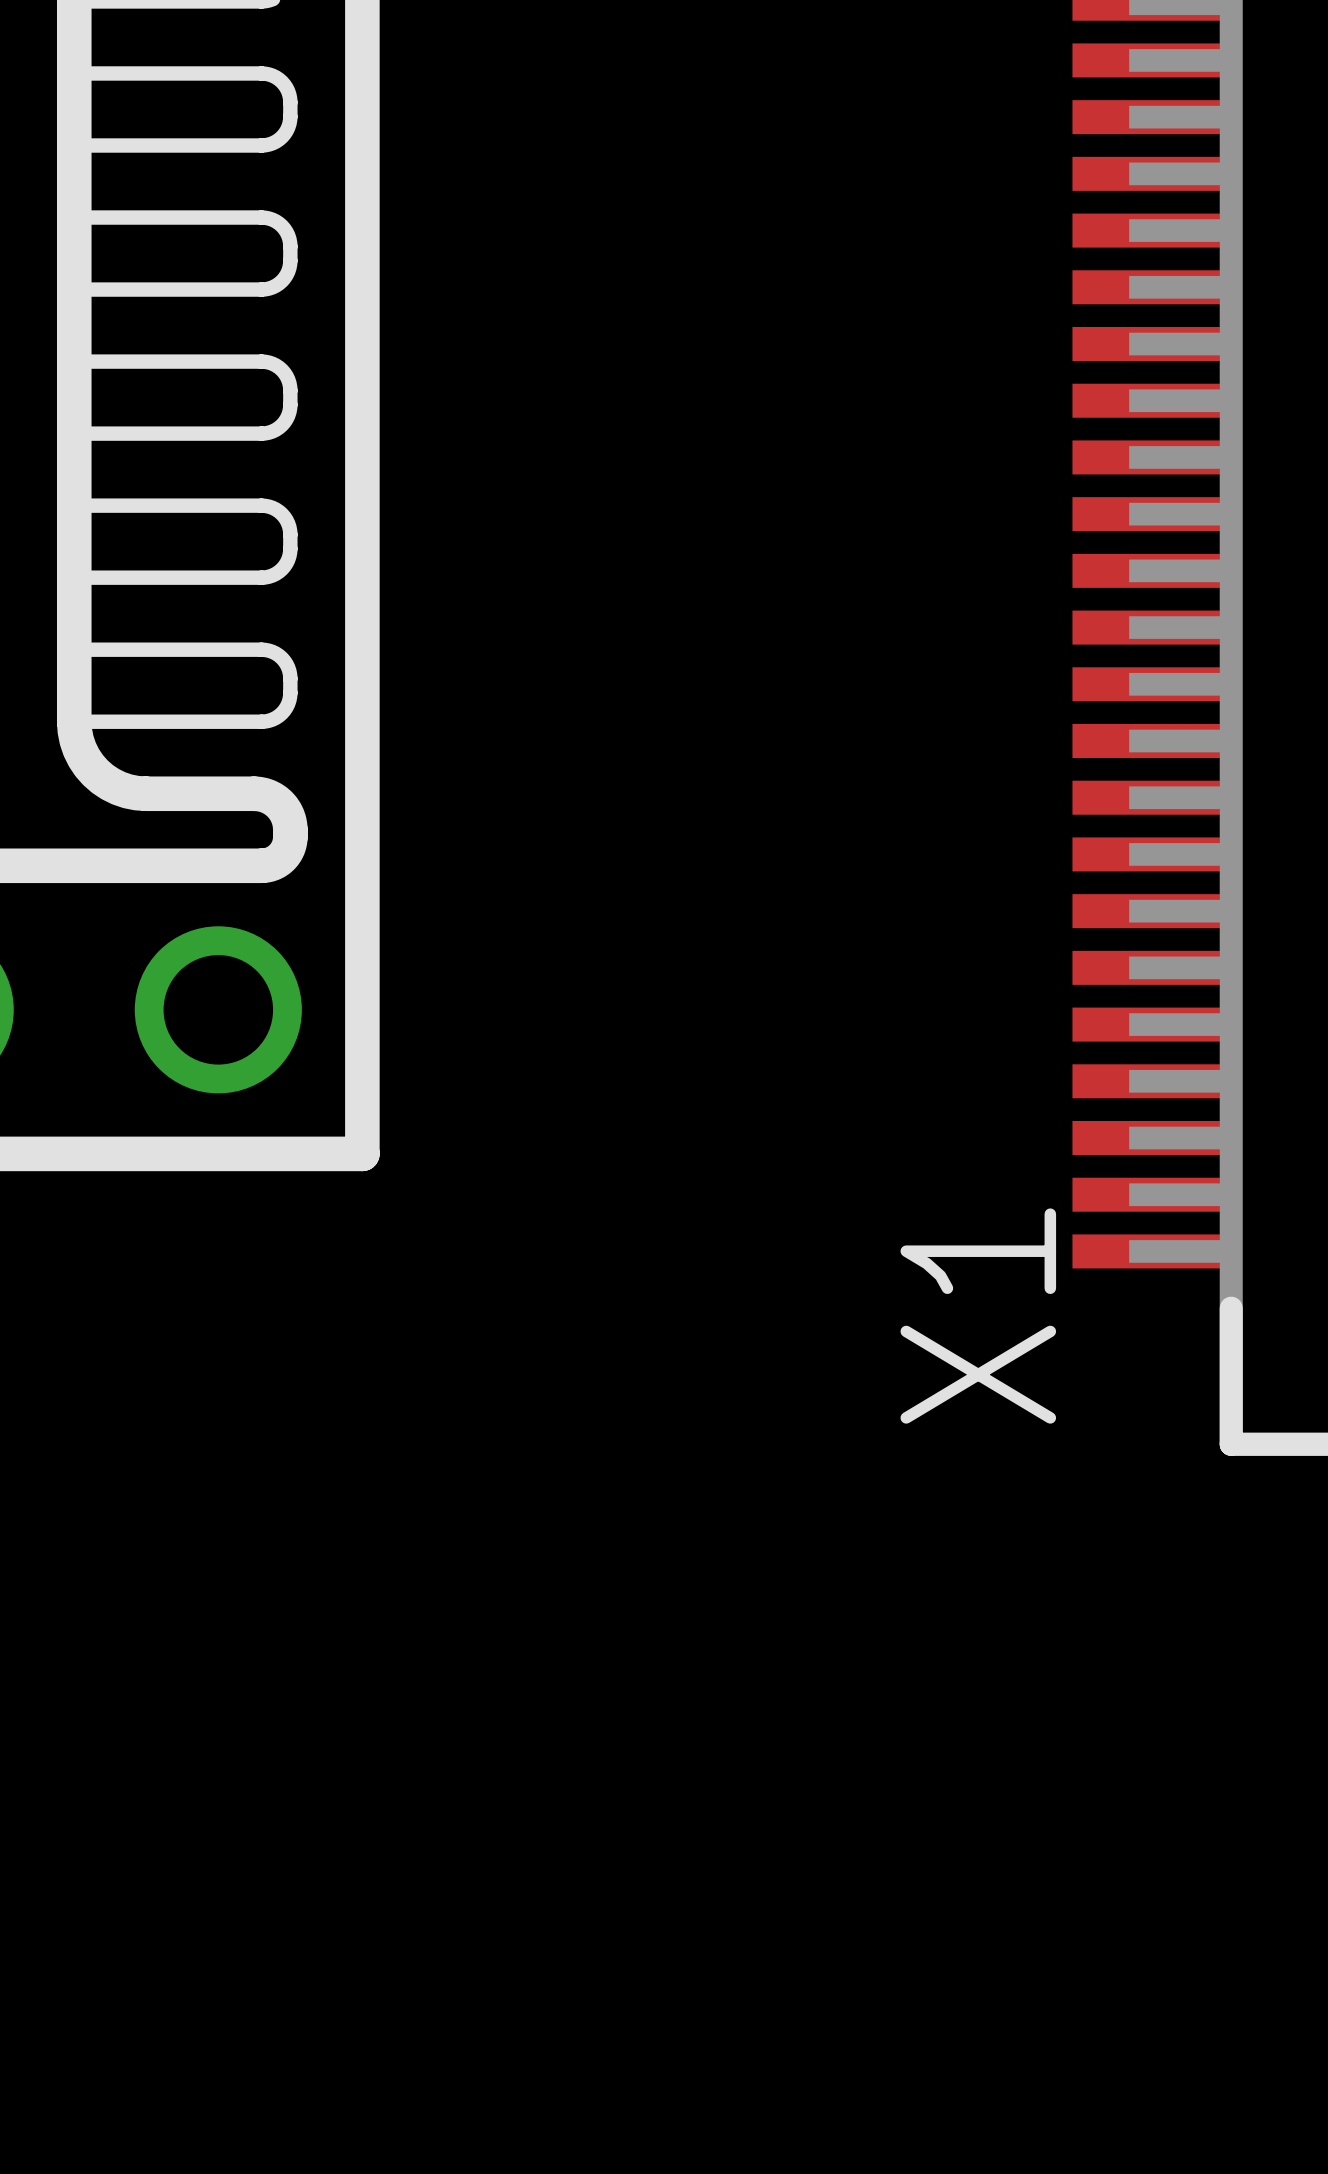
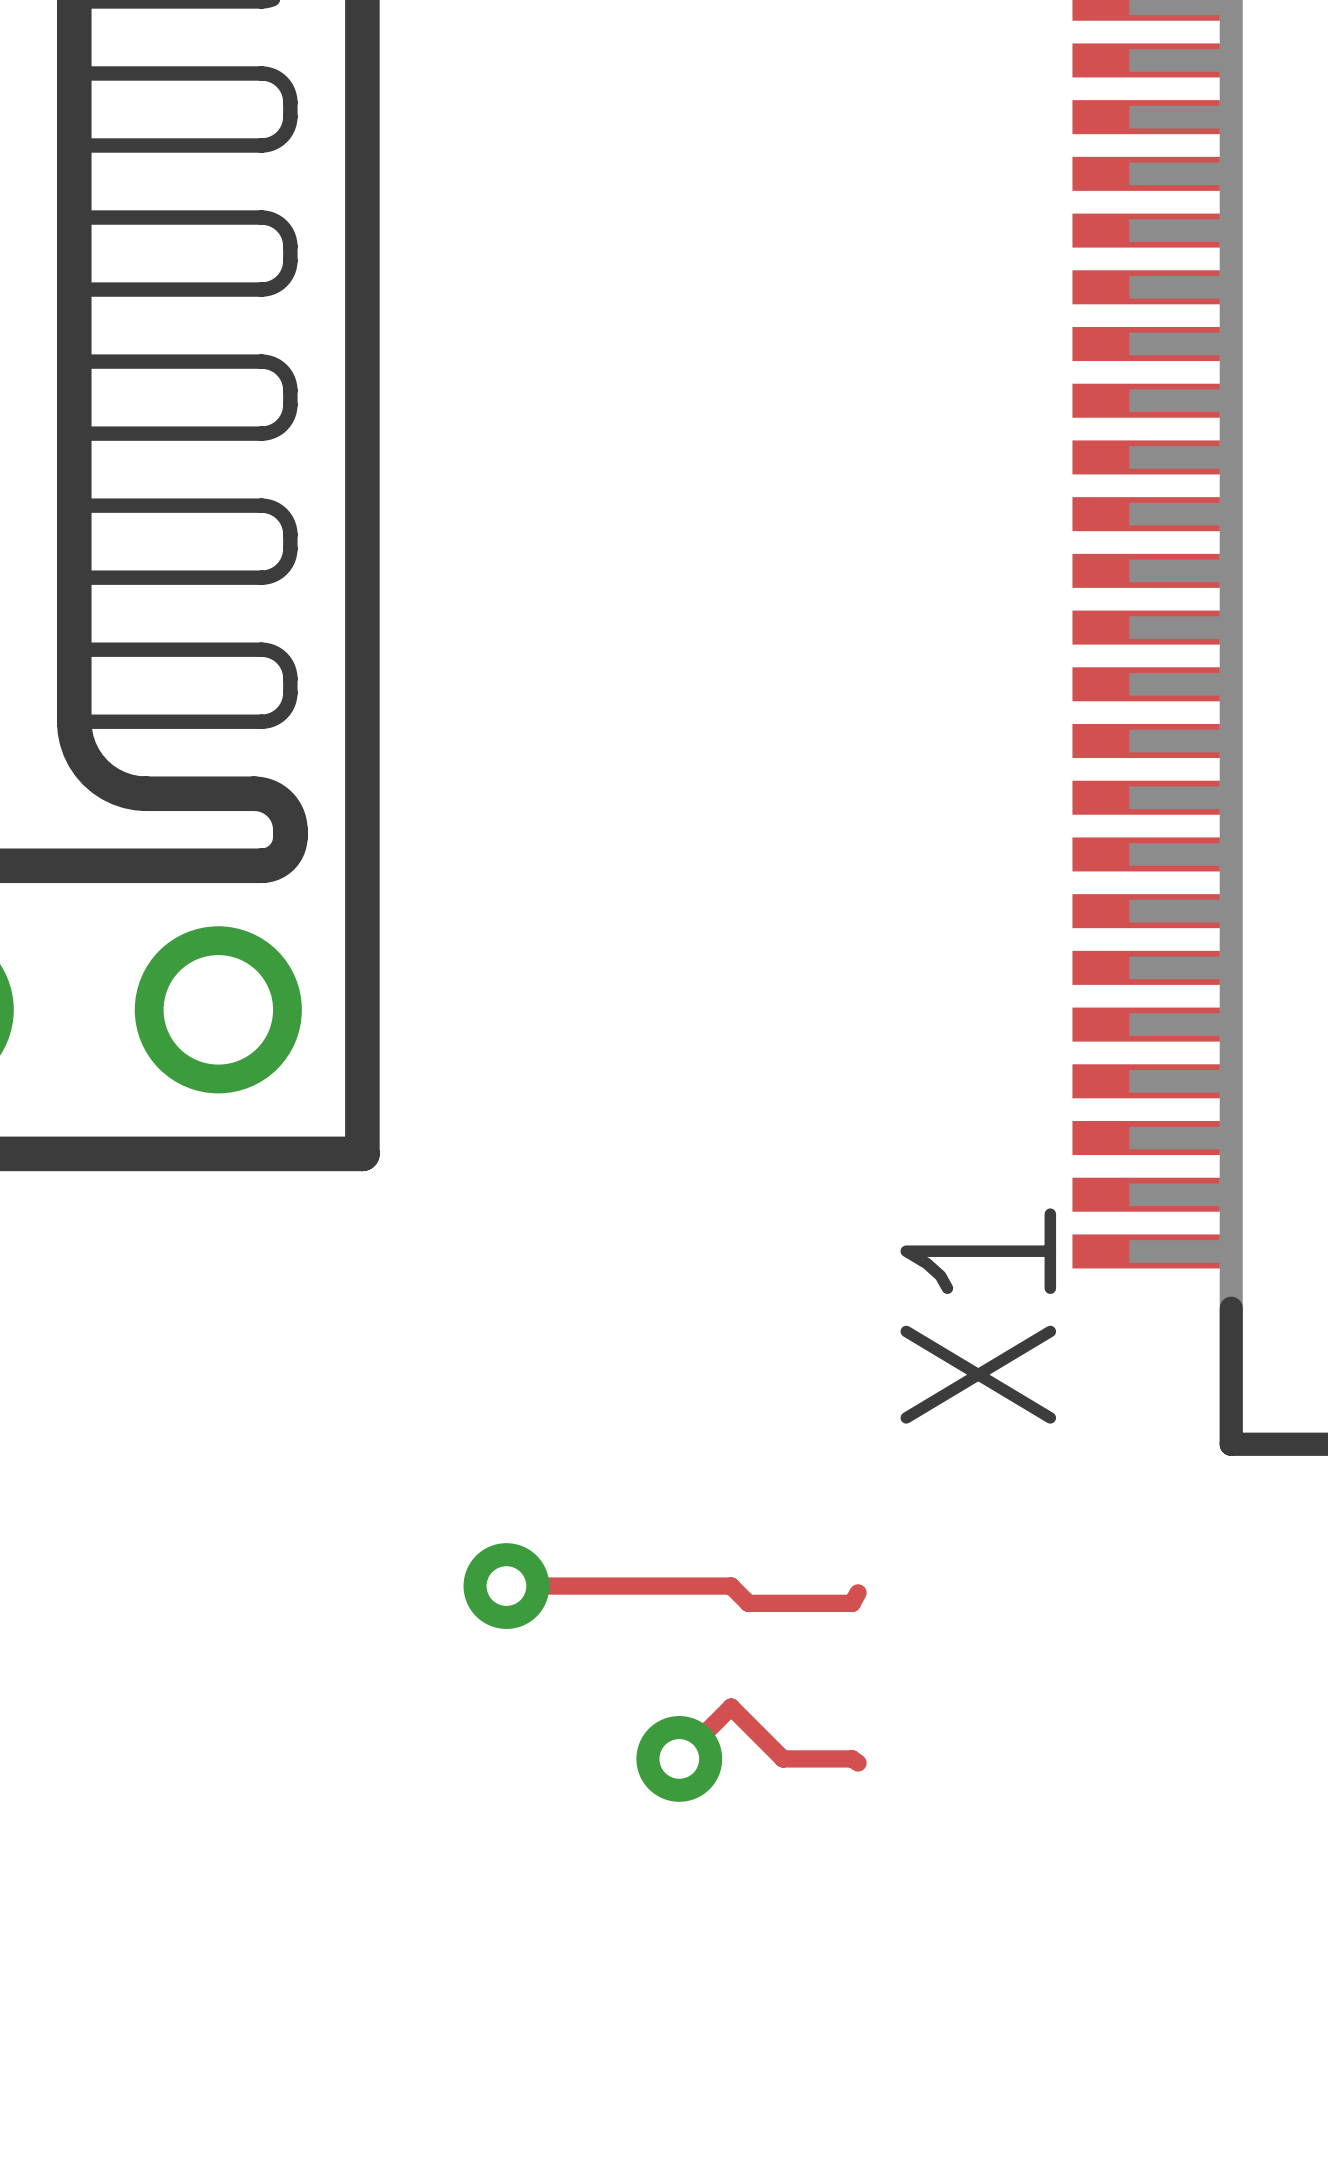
top track: none -> (506, 1586) (731, 1586) (748, 1603) (852, 1603) (858, 1592)
via: none -> (506, 1586)
top track: none -> (679, 1758) (731, 1707) (783, 1758) (852, 1758) (858, 1763)
via: none -> (679, 1758)

